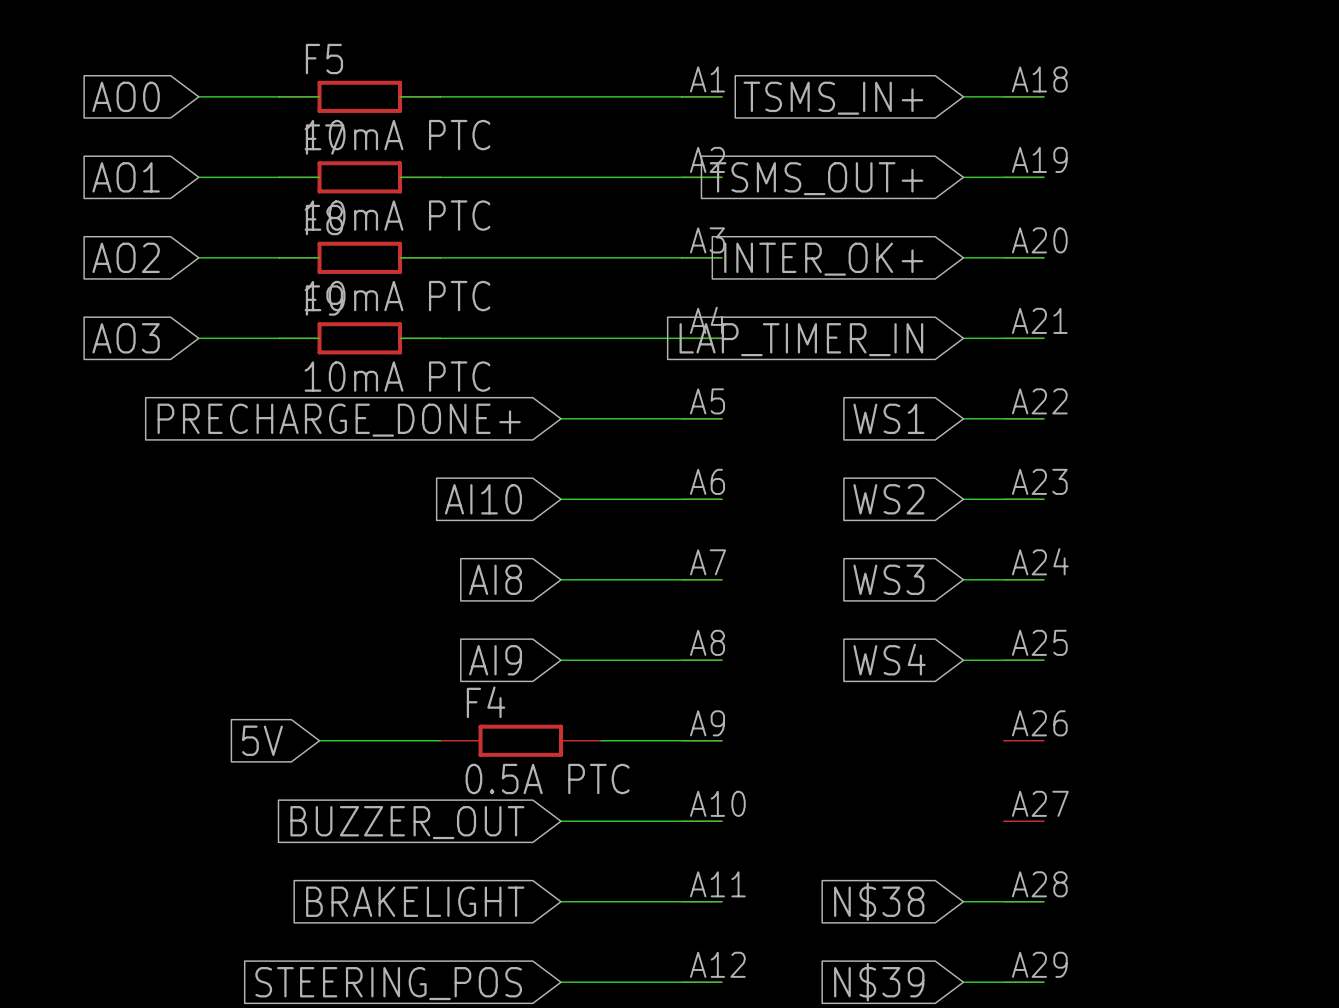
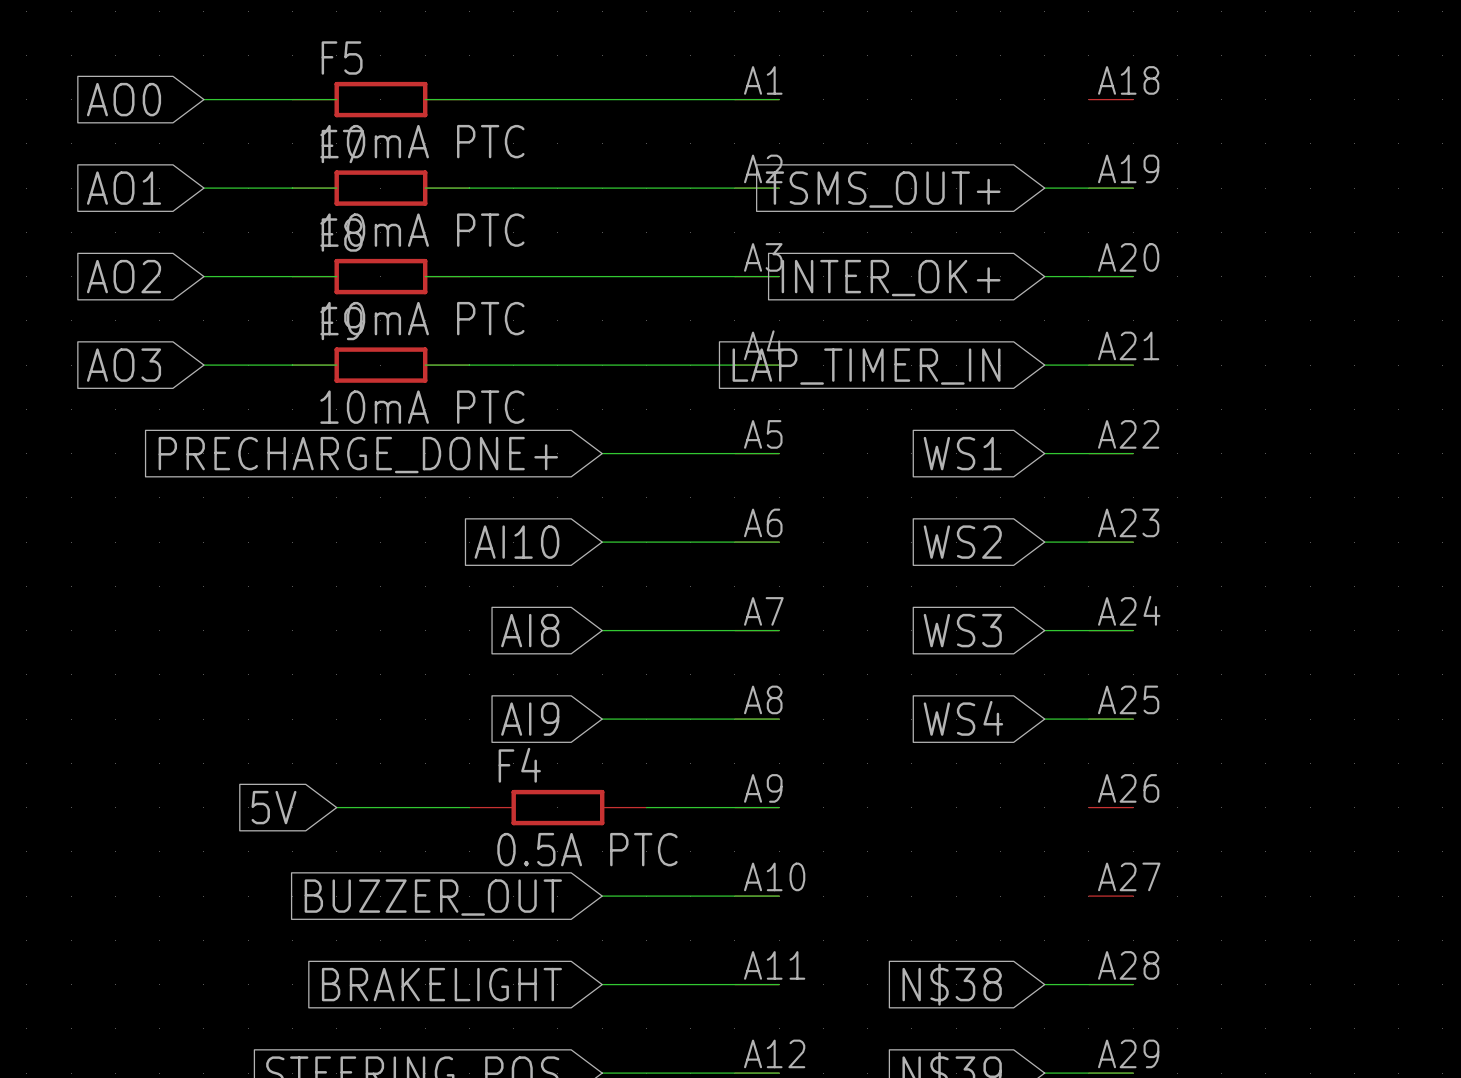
wire: (963, 96) (1043, 96) -> none
global label: TSMS_IN+ (833, 98) -> none

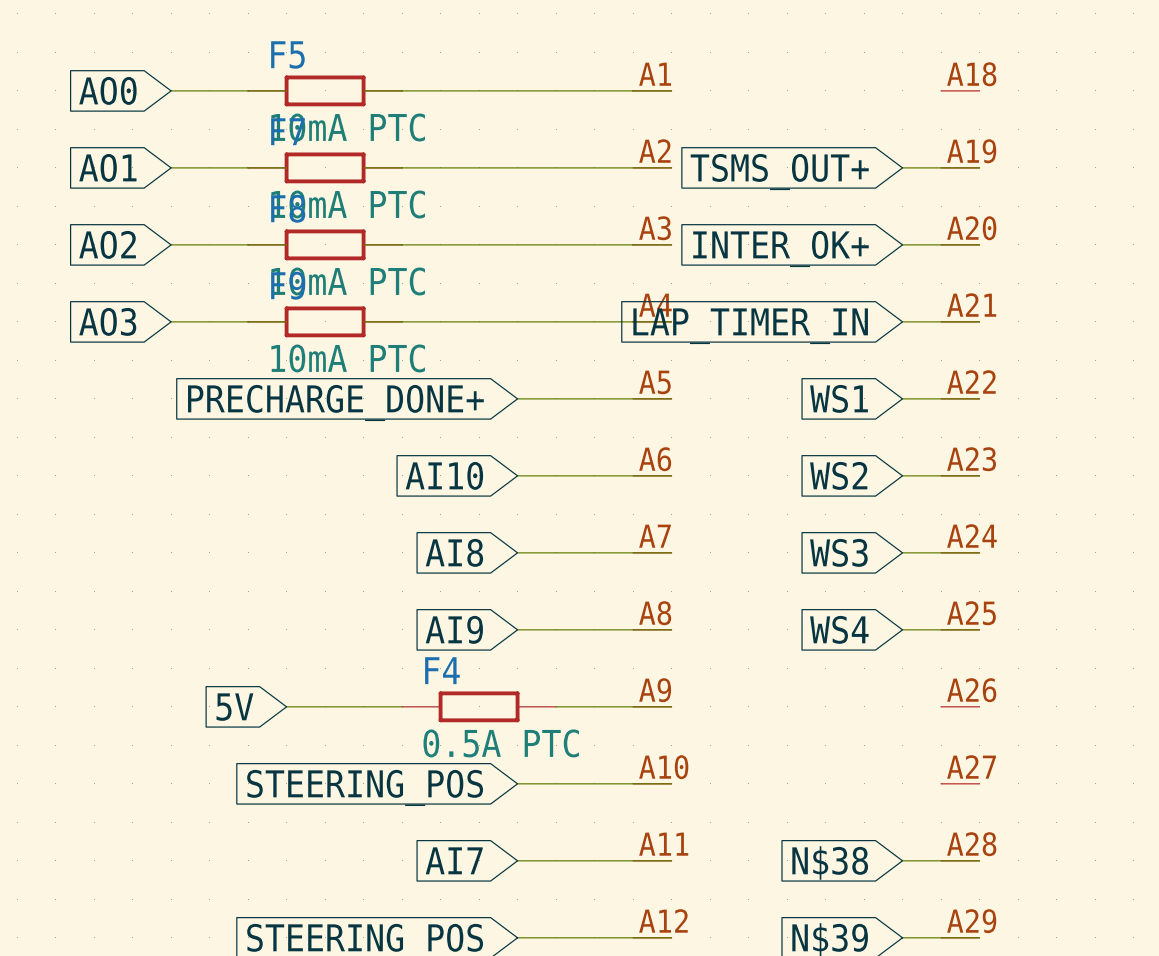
global label: BUZZER_OUT (433, 897) -> STEERING_POS (365, 787)
global label: BRAKELIGHT (441, 984) -> AI7 (454, 860)

